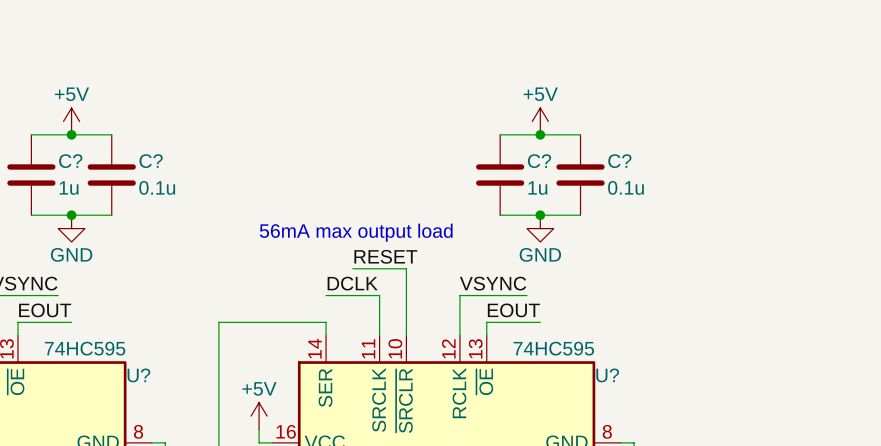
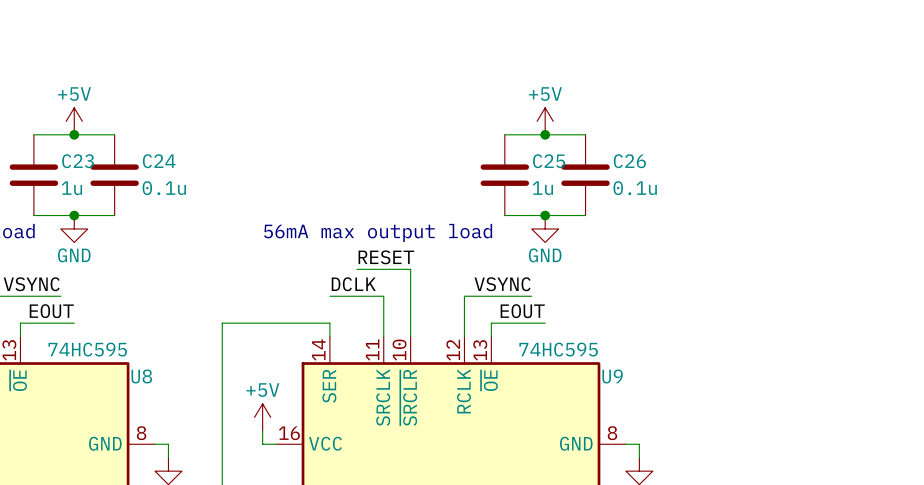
C? name: C? (70, 161) -> C23 (78, 161)
C? name: C? (151, 161) -> C24 (159, 161)
C? name: C? (539, 161) -> C25 (549, 161)
C? name: C? (619, 161) -> C26 (629, 161)
U? name: U? (138, 375) -> U8 (141, 376)
U? name: U? (607, 375) -> U9 (612, 376)

